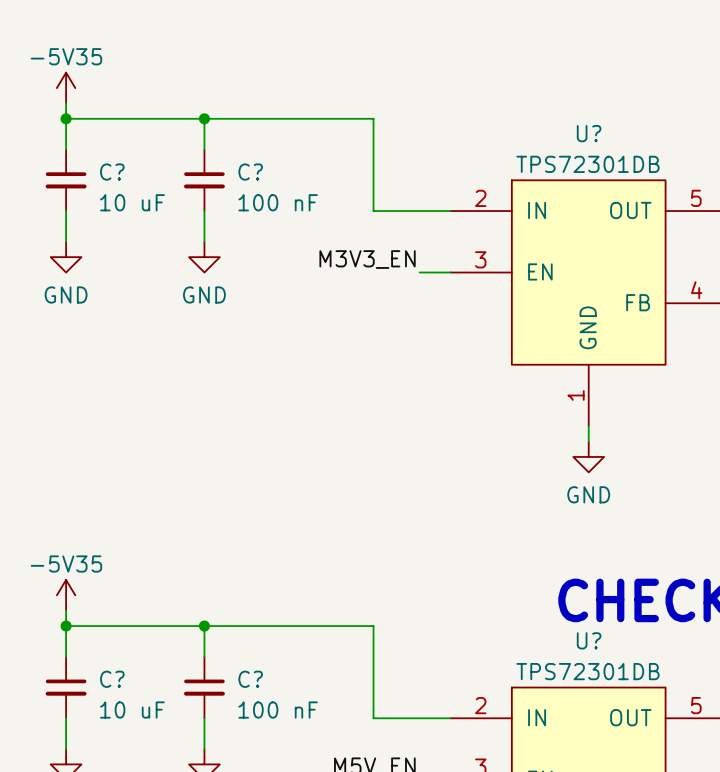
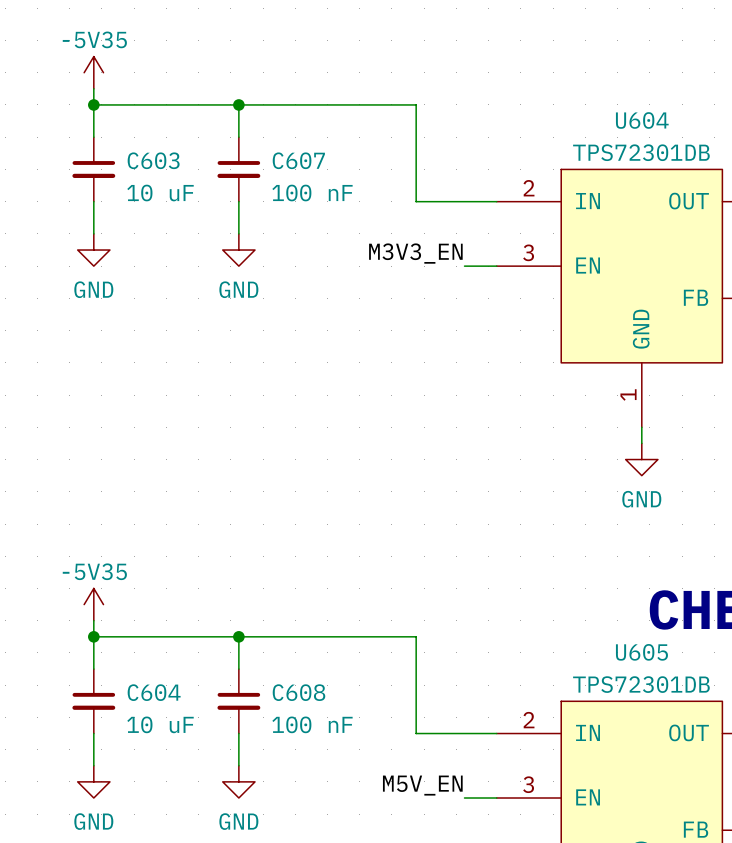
U? name: U? (589, 133) -> U604 (642, 120)
C? name: C? (112, 172) -> C603 (153, 160)
C? name: C? (250, 172) -> C607 (298, 160)
U? name: U? (589, 640) -> U605 (641, 652)
C? name: C? (112, 679) -> C604 (154, 692)
C? name: C? (250, 679) -> C608 (298, 692)

